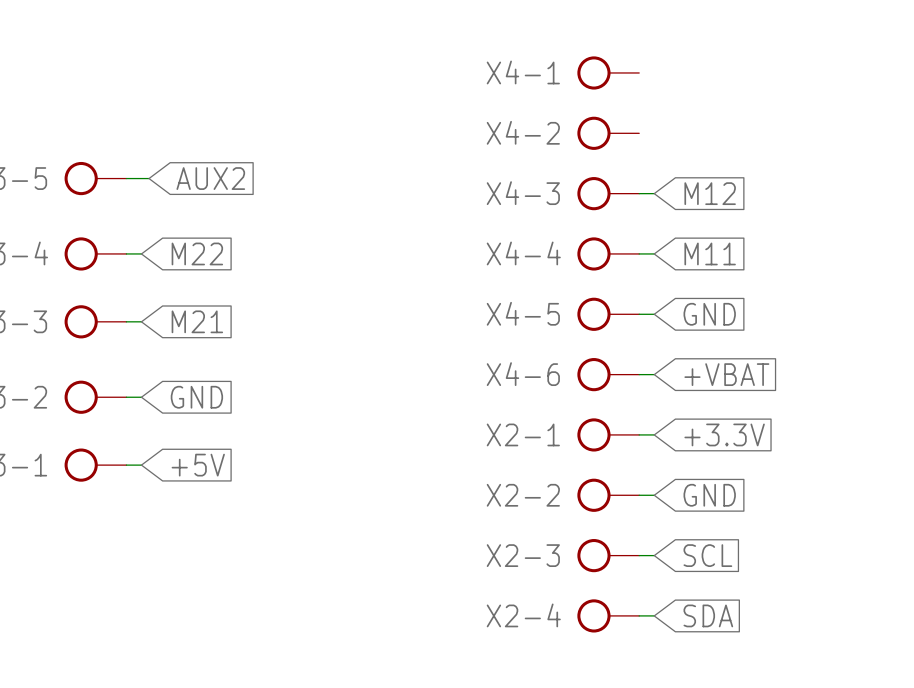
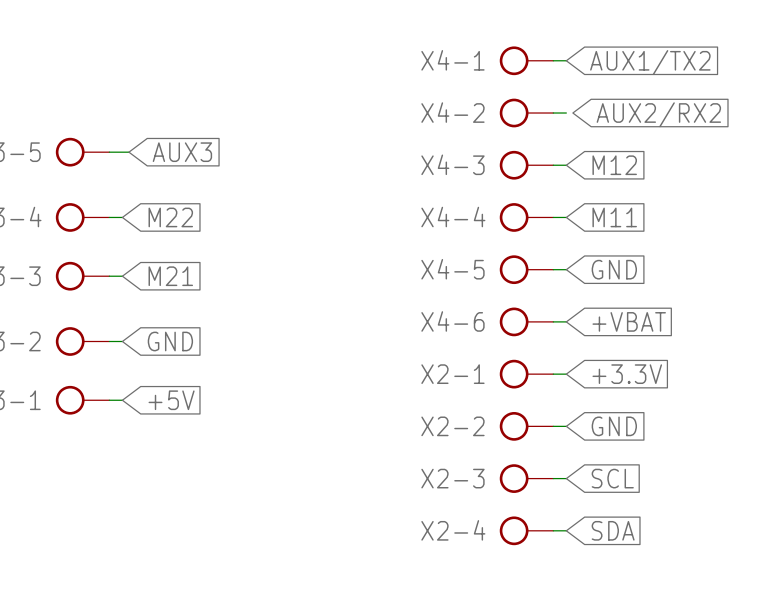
wire: none -> (553, 60) (566, 60)
global label: none -> AUX1/TX2 (650, 62)
wire: none -> (553, 113) (566, 113)
global label: none -> AUX2/RX2 (658, 114)
global label: AUX2 (210, 178) -> AUX3 (182, 152)

